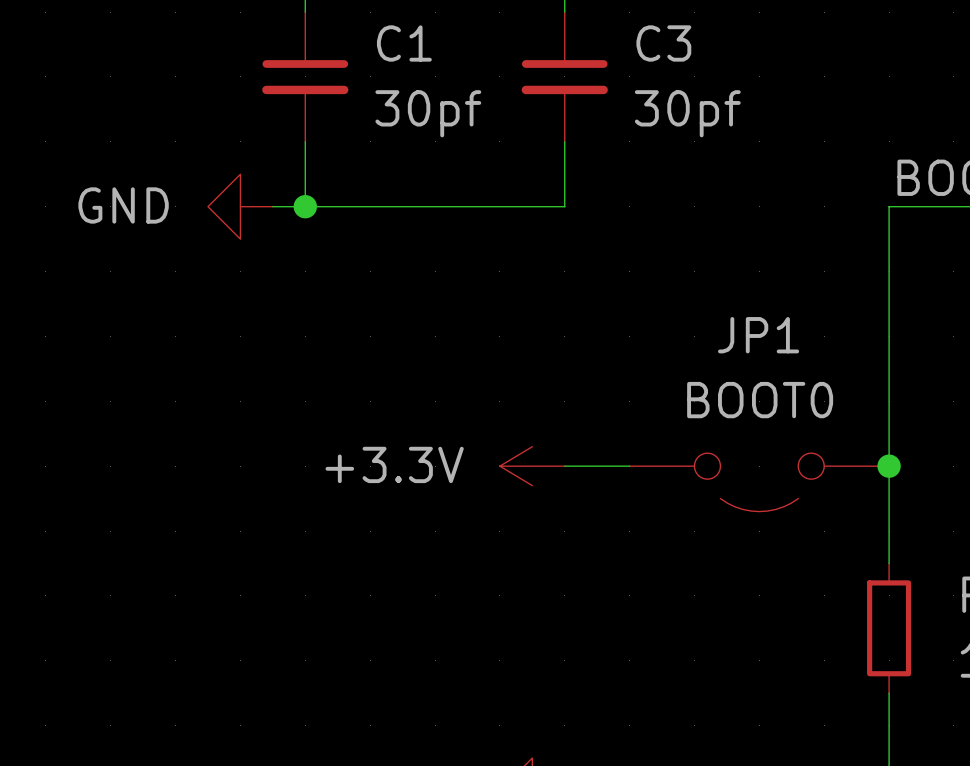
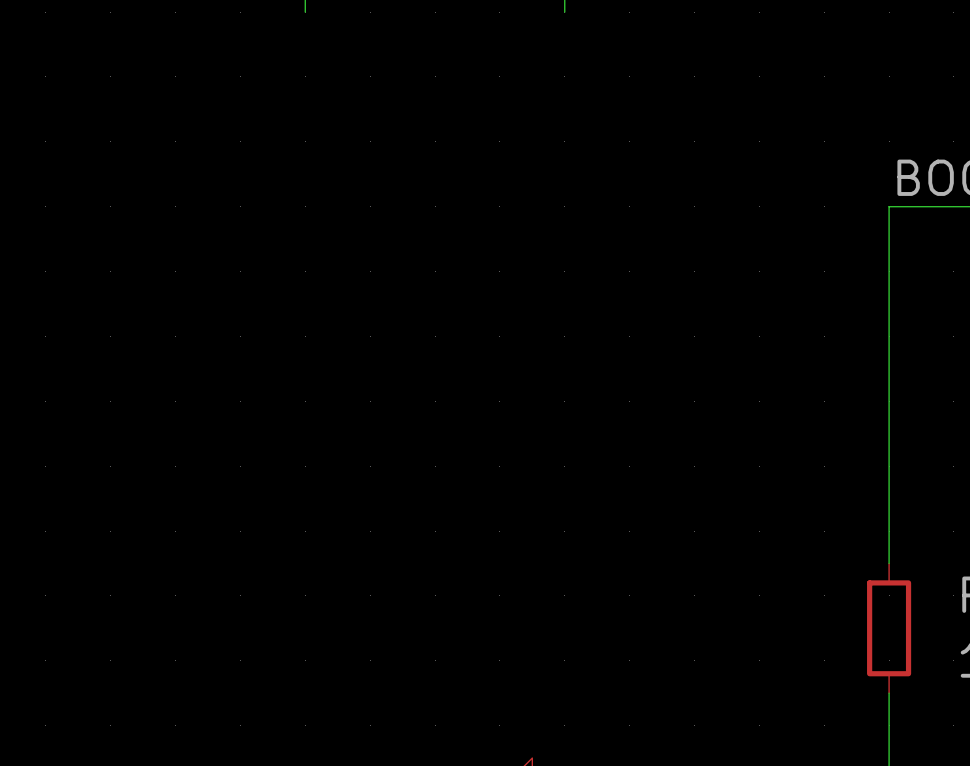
C1: 30pf (305, 76) -> none
C3: 30pf (564, 76) -> none
wire: (305, 141) (305, 206) -> none
wire: (564, 141) (564, 206) (272, 206) -> none
power symbol: GND (240, 206) -> none
junction: (305, 206) -> none
power symbol: +3.3V (532, 466) -> none
wire: (564, 466) (629, 466) -> none
junction: (889, 466) -> none
JP1: BOOT0 (759, 482) -> none

